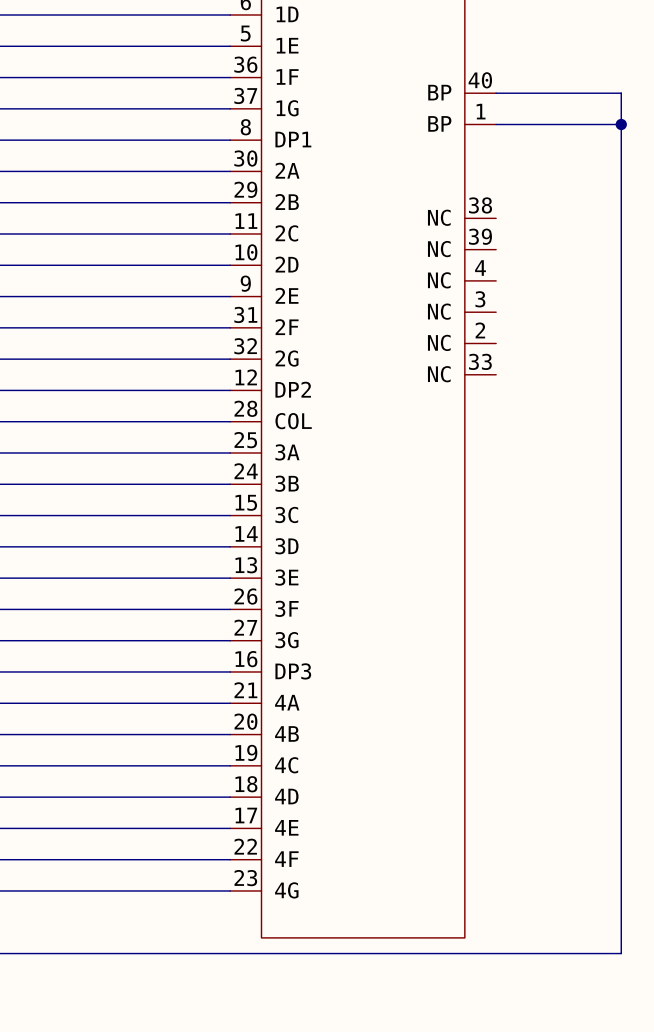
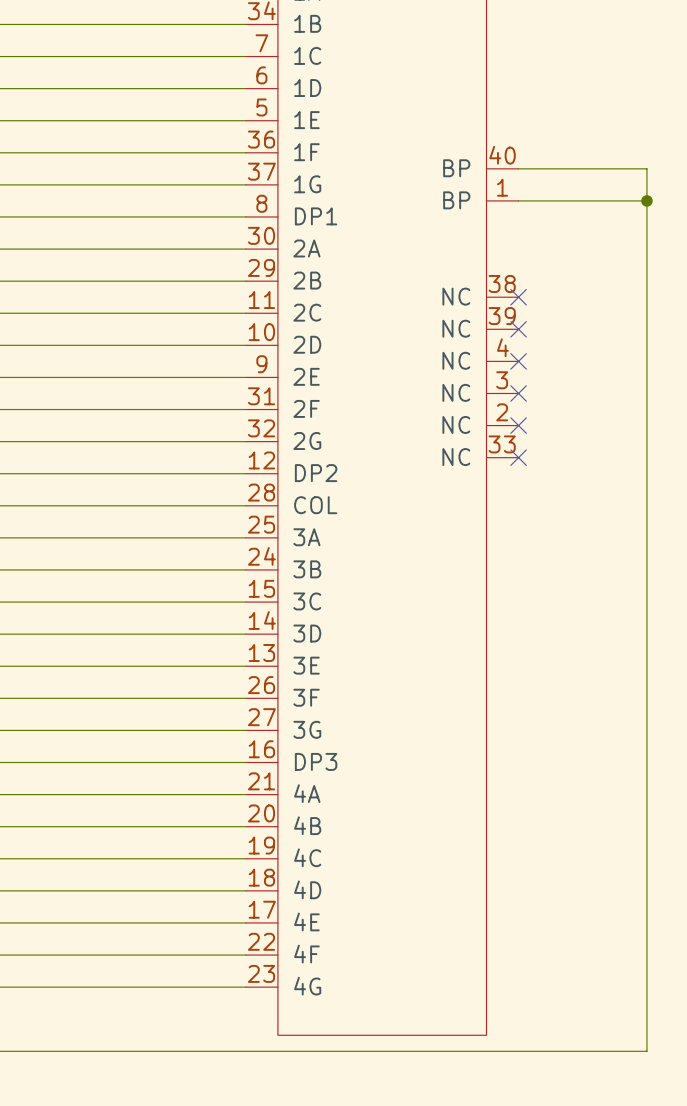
no-connect mark: none -> (518, 297)
no-connect mark: none -> (518, 329)
no-connect mark: none -> (518, 361)
no-connect mark: none -> (518, 393)
no-connect mark: none -> (518, 425)
no-connect mark: none -> (518, 457)

